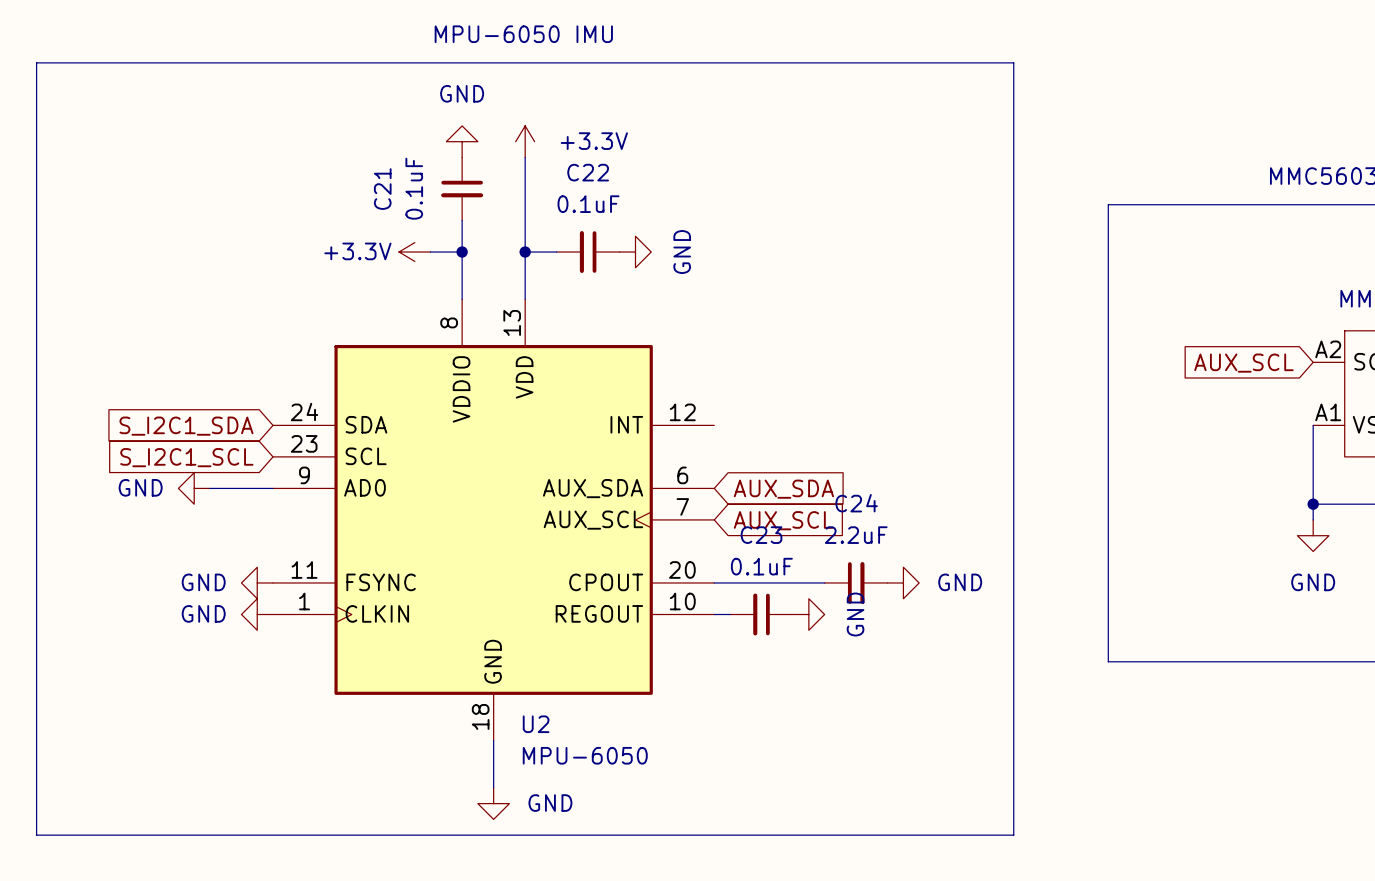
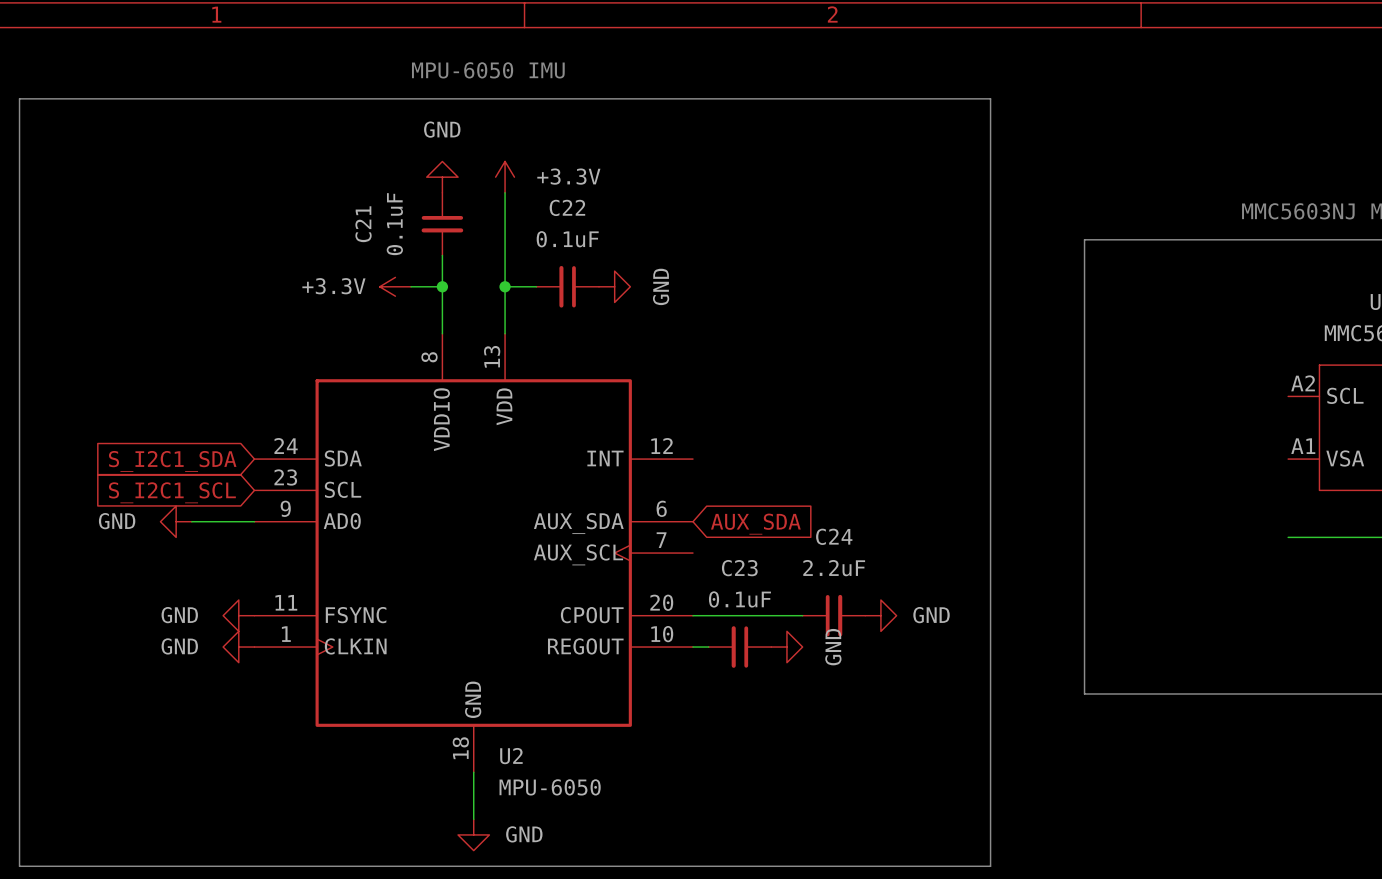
global label: AUX_SCL (1243, 363) -> none
wire: (1313, 425) (1313, 519) -> none
junction: (1313, 504) -> none
global label: AUX_SCL (783, 520) -> none
power symbol: GND (1313, 535) -> none

